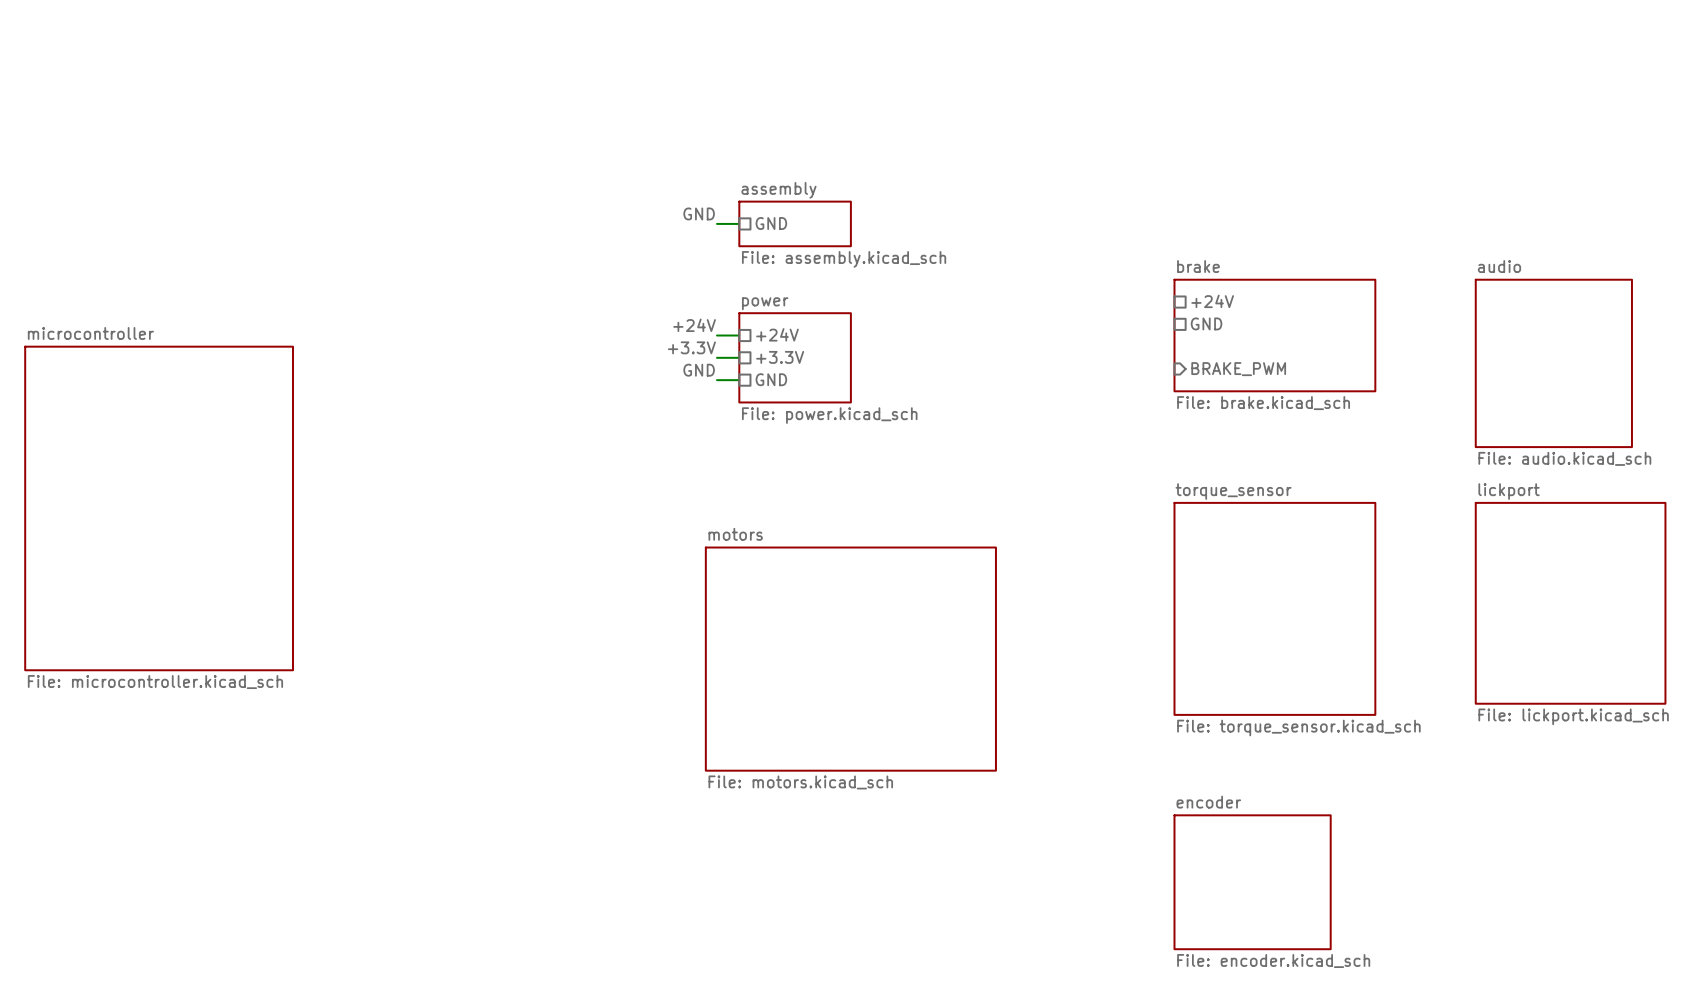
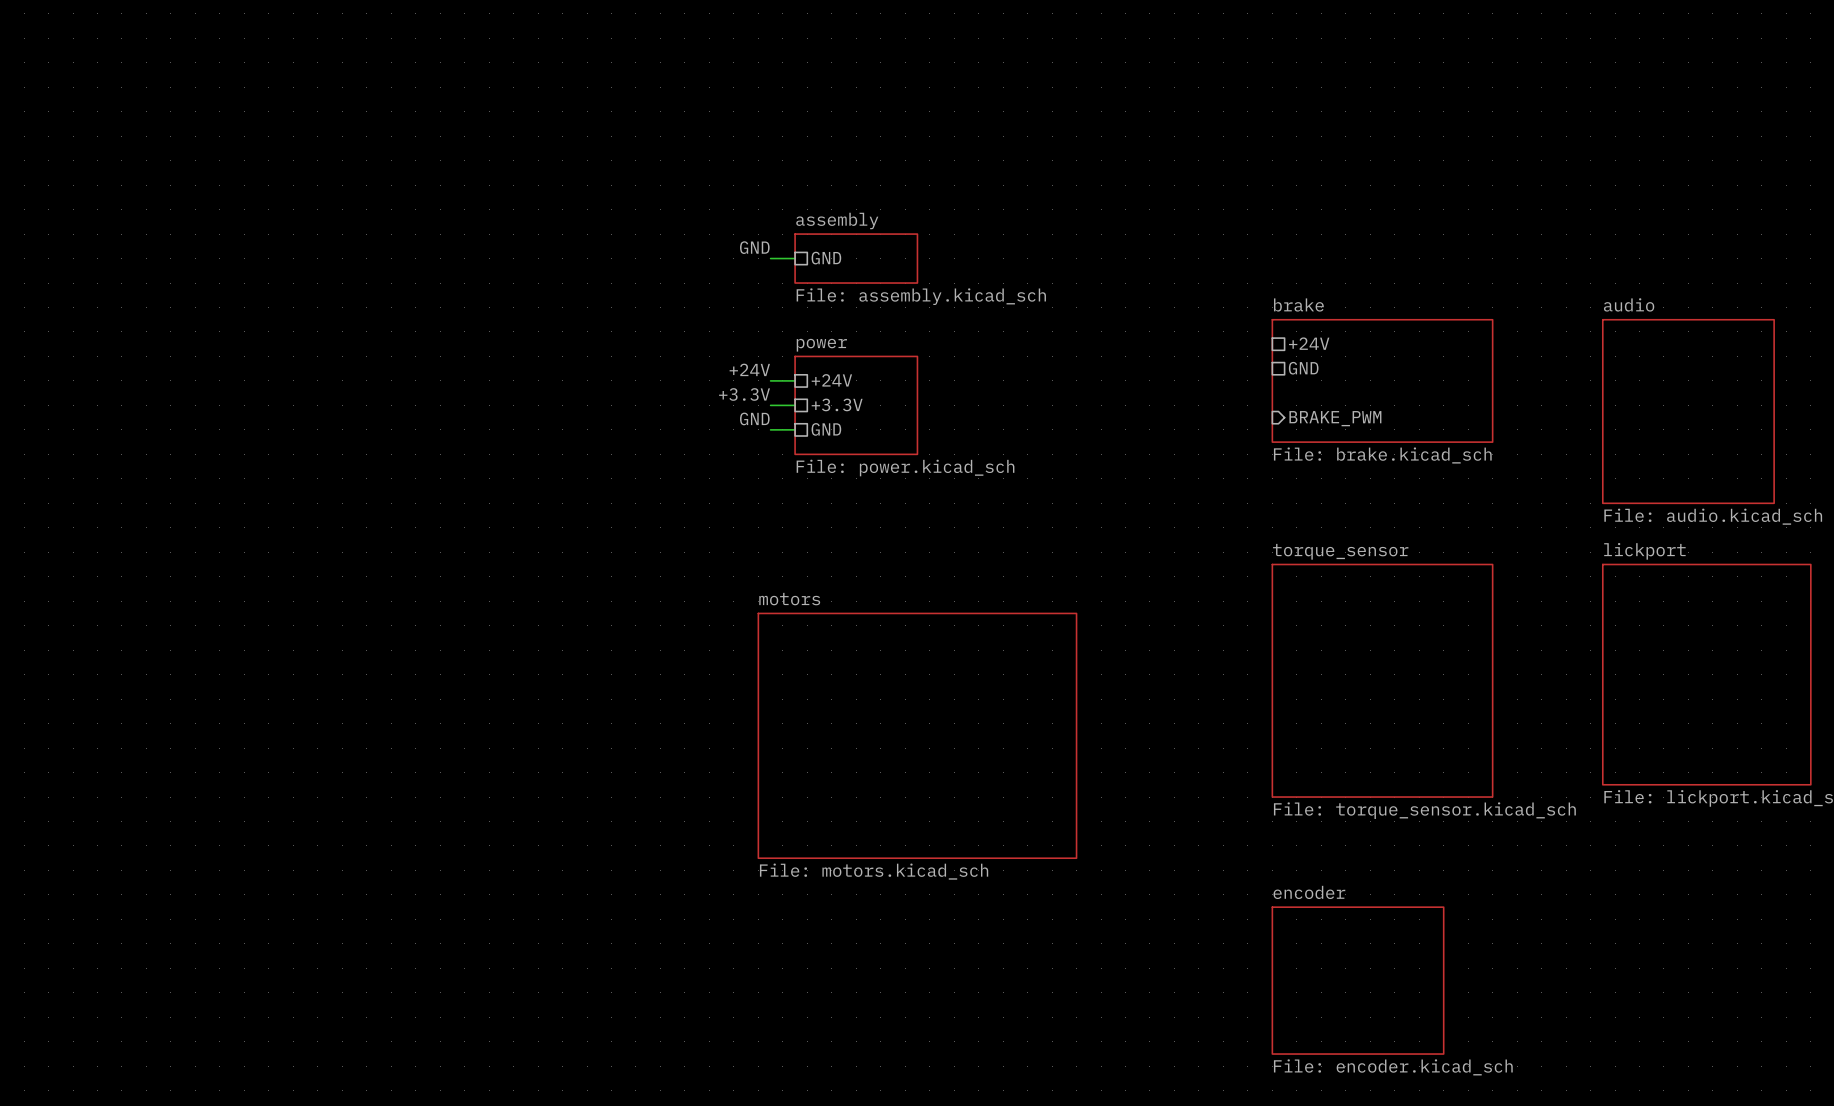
sheet microcontroller: File: microcontroller.kicad_sch (159, 508) -> none

